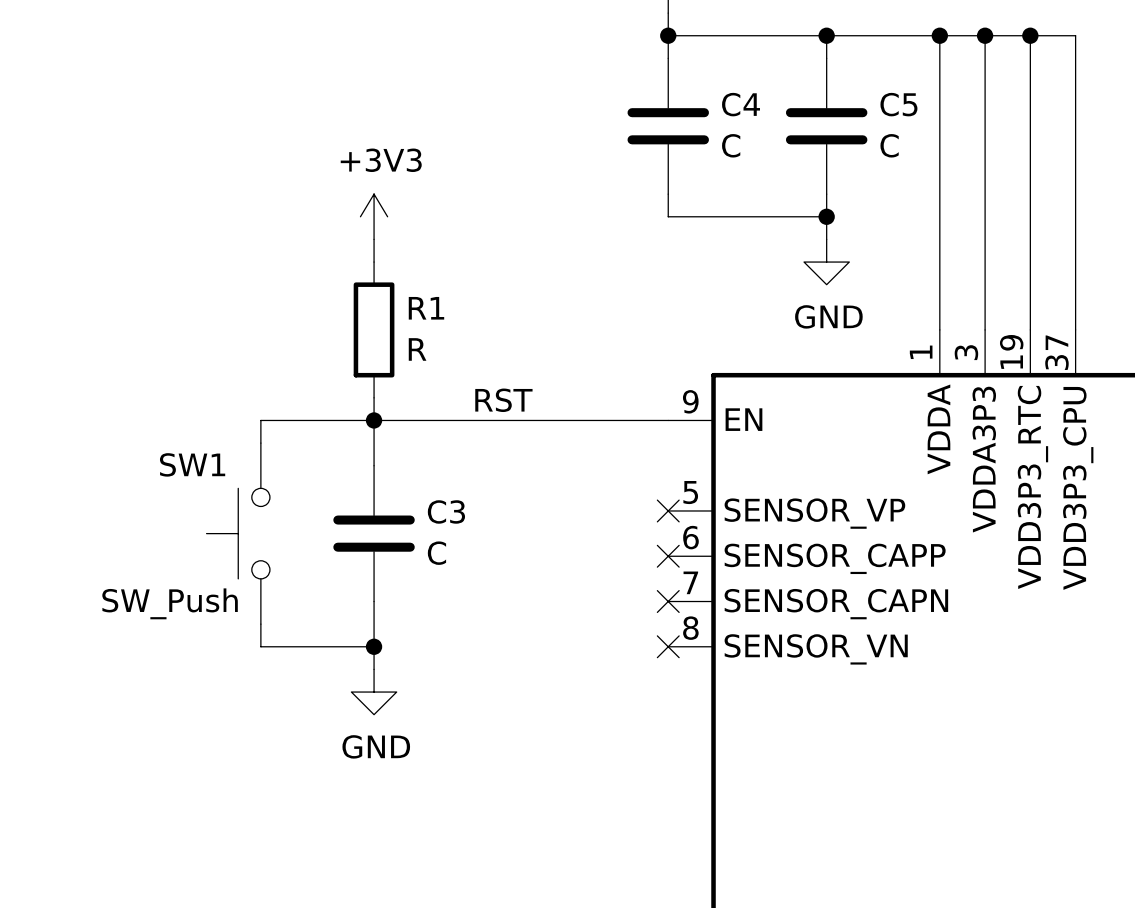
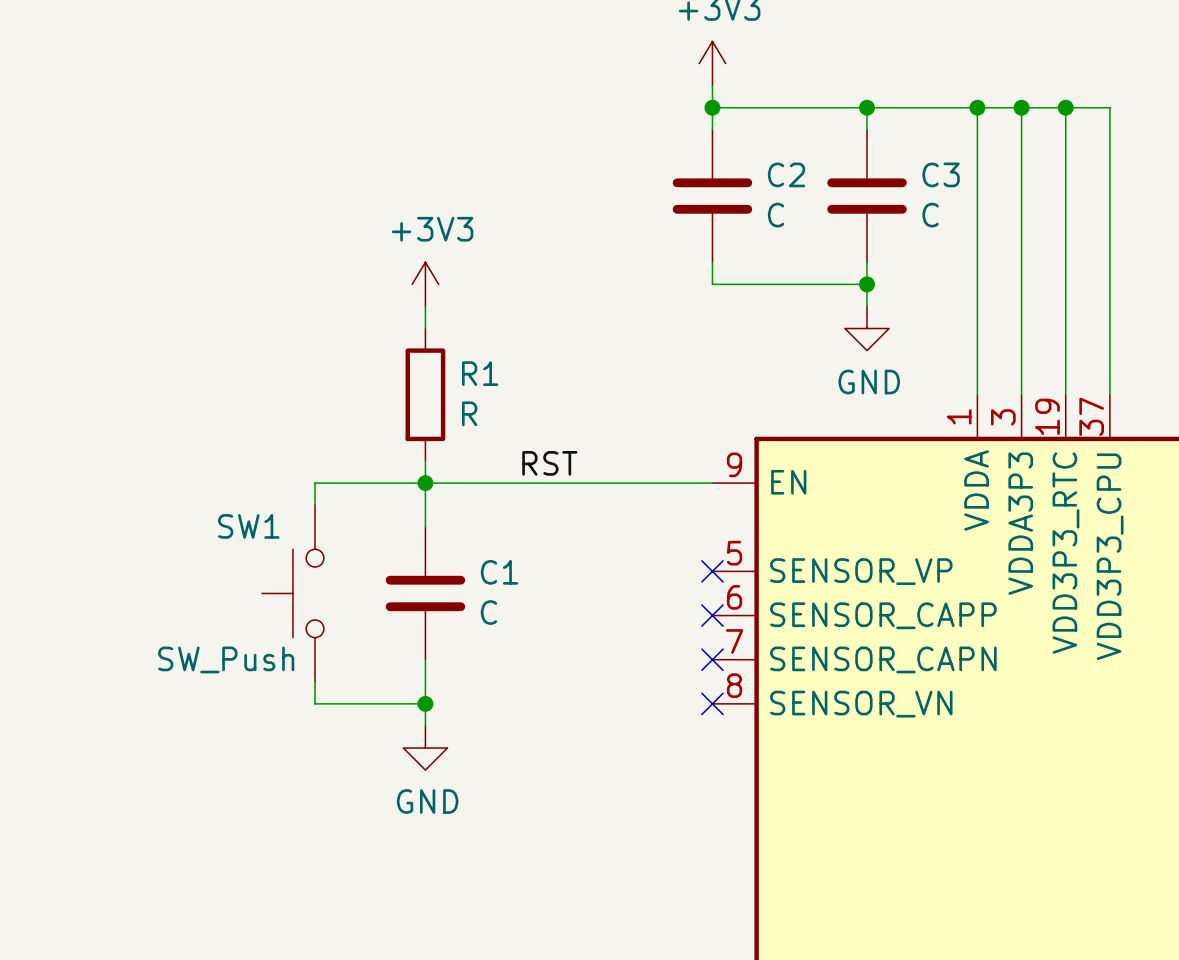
C4 name: C4 (741, 104) -> C2 (786, 174)
C5 name: C5 (898, 104) -> C3 (941, 174)
C3 name: C3 (446, 511) -> C1 (499, 572)

